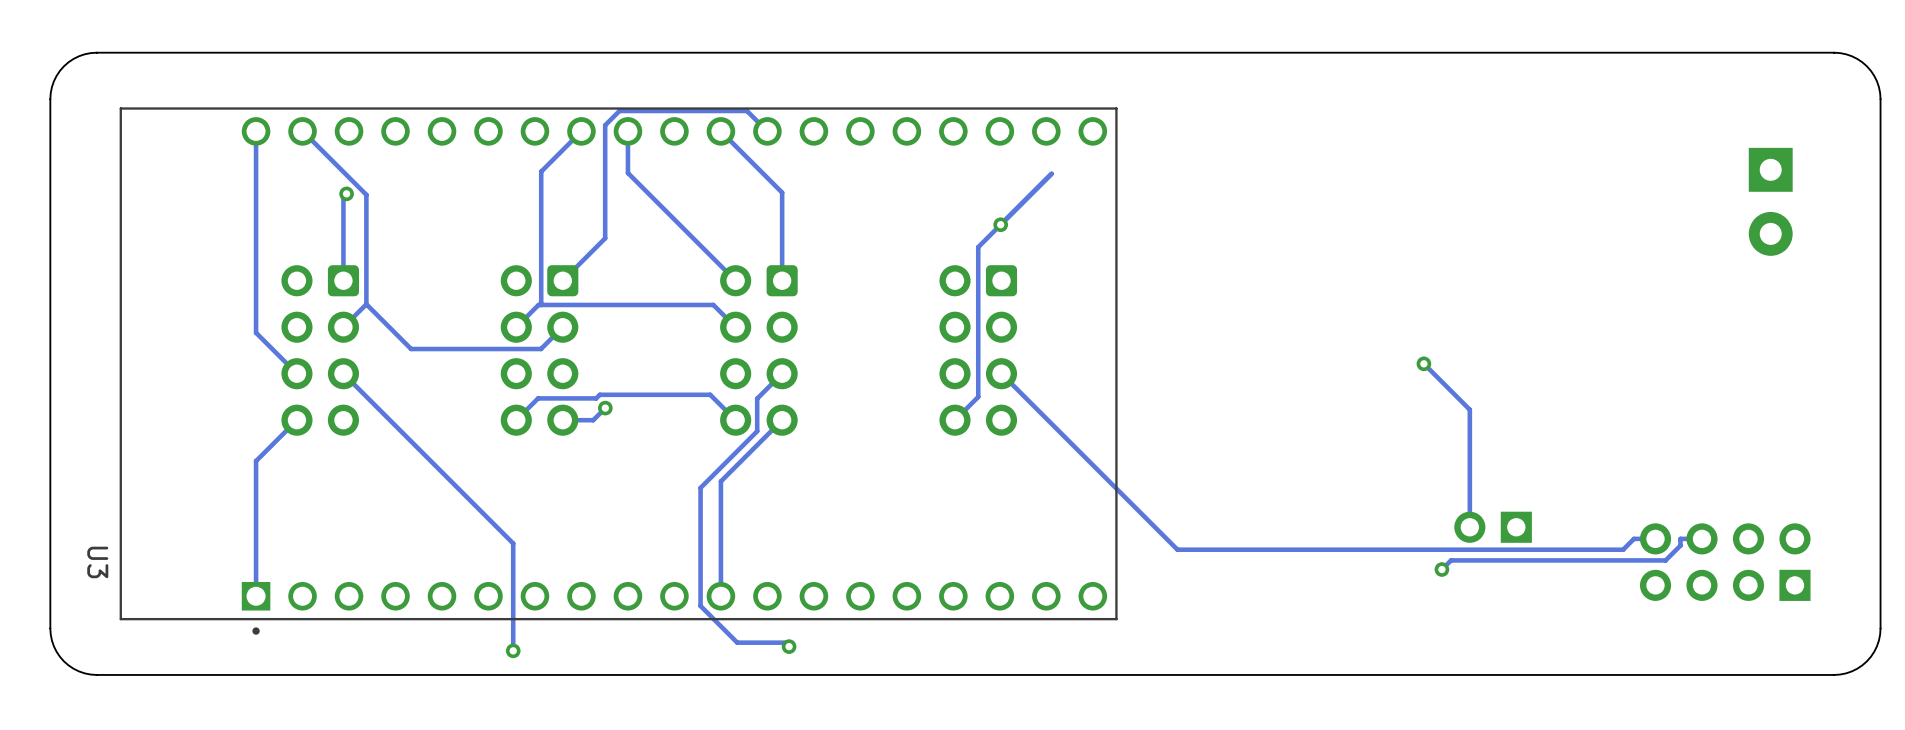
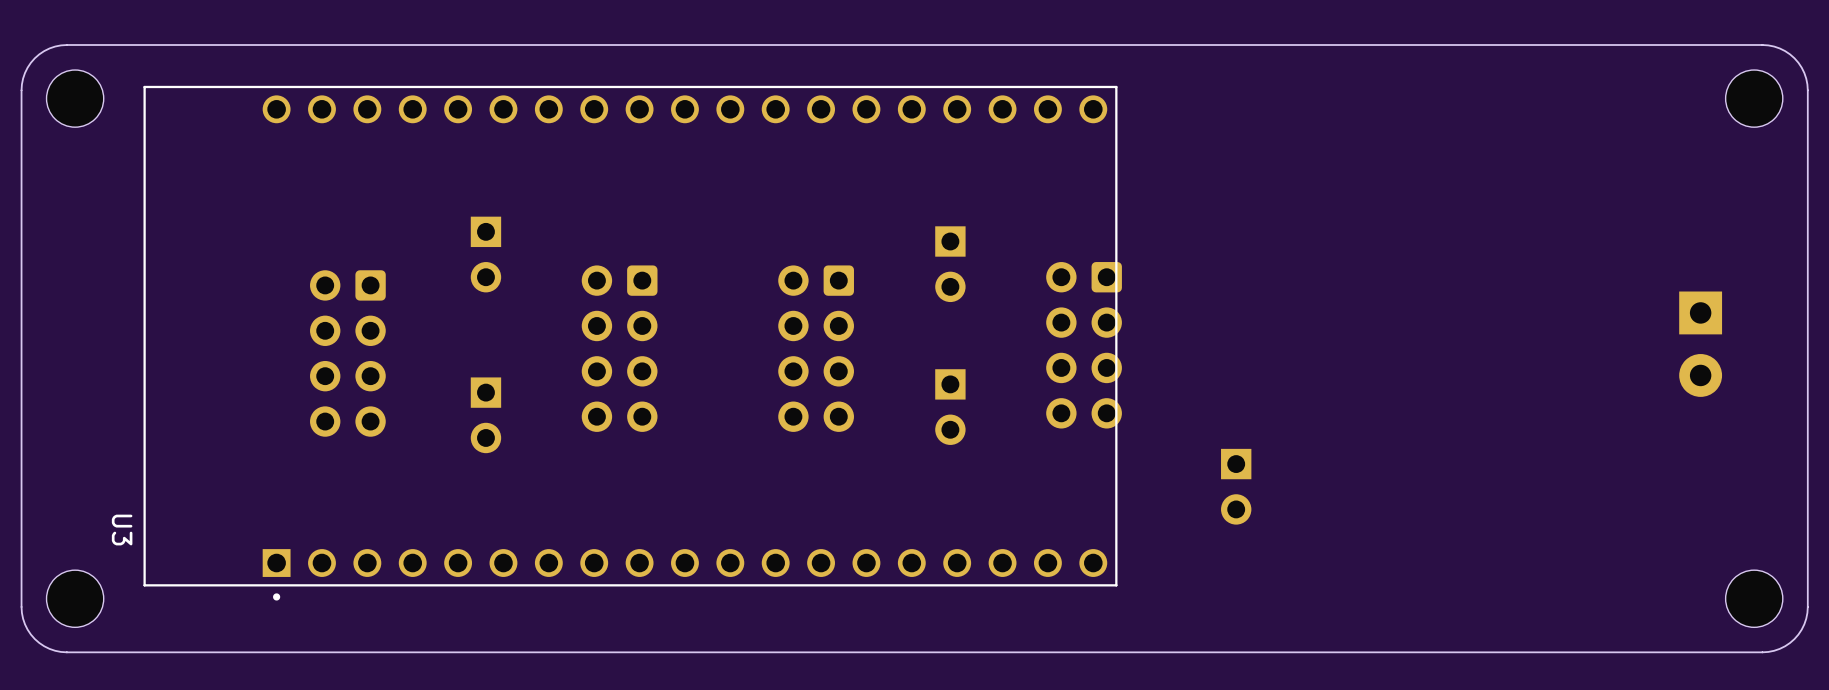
part: none -> (75, 98)
part: none -> (1754, 98)
track: (256, 131) (256, 332) (296, 373) -> none
track: (302, 131) (366, 194) (366, 304) -> none
track: (581, 131) (541, 171) (541, 304) -> none
track: (627, 131) (627, 173) (735, 280) -> none
track: (720, 131) (782, 192) (782, 280) -> none
track: (767, 131) (746, 110) (619, 110) (605, 125) (605, 238) (562, 280) -> none
track: (1051, 173) (978, 247) (978, 396) (955, 420) -> none
track: (346, 193) (343, 196) (343, 280) -> none
via: (346, 193) -> none
part position: (1770, 201) -> (1700, 344)
via: (1000, 224) -> none
part: none -> (485, 254)
part: none -> (950, 264)
track: (366, 304) (343, 327) -> none
track: (366, 304) (411, 349) (541, 349) (562, 327) -> none
track: (735, 327) (713, 304) (538, 304) (516, 327) -> none
part position: (320, 350) -> (347, 353)
part: (539, 350) -> none
part: (758, 350) -> none
part: (978, 350) -> none
part: none -> (1084, 345)
part: none -> (619, 348)
part: none -> (816, 348)
track: (1423, 363) (1469, 409) (1469, 527) -> none
via: (1423, 363) -> none
U3 position: (618, 371) -> (630, 343)
track: (343, 373) (513, 543) (513, 650) -> none
track: (782, 373) (757, 398) (757, 431) (700, 487) (700, 605) (737, 642) (789, 642) (789, 646) -> none
track: (1001, 373) (1177, 549) (1623, 549) (1633, 538) (1655, 538) -> none
track: (605, 408) (593, 420) (562, 420) -> none
via: (605, 408) -> none
track: (296, 420) (256, 461) (256, 596) -> none
track: (735, 420) (710, 394) (599, 394) (596, 398) (538, 398) (516, 420) -> none
track: (782, 420) (720, 481) (720, 596) -> none
part: none -> (950, 407)
part: none -> (485, 415)
part rotation: 0° (1493, 527) -> 90° counterclockwise (1236, 486)
part position: (1493, 527) -> (1236, 486)
track: (1702, 538) (1680, 538) (1680, 545) (1665, 560) (1451, 560) (1441, 569) -> none
part: (1725, 562) -> none
via: (1441, 569) -> none
part: none -> (75, 598)
part: none -> (1754, 598)
via: (789, 646) -> none
via: (513, 650) -> none

